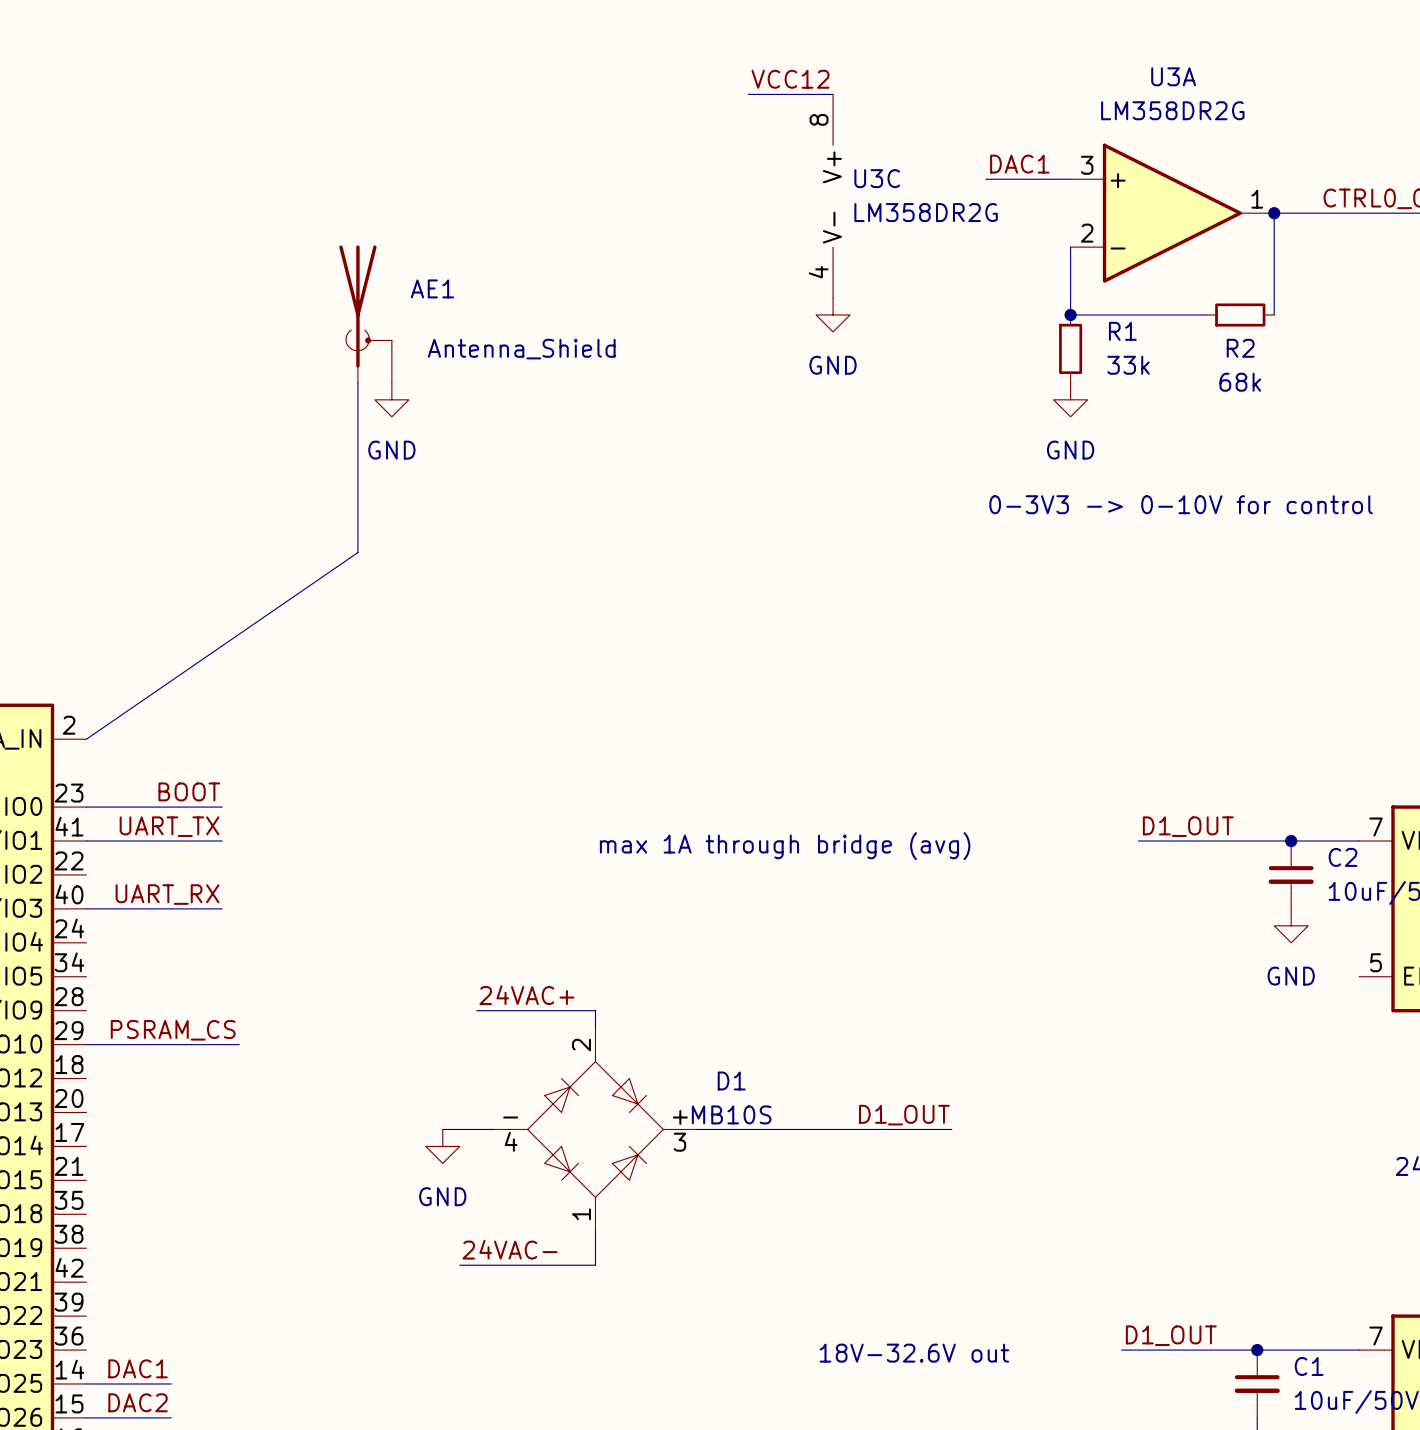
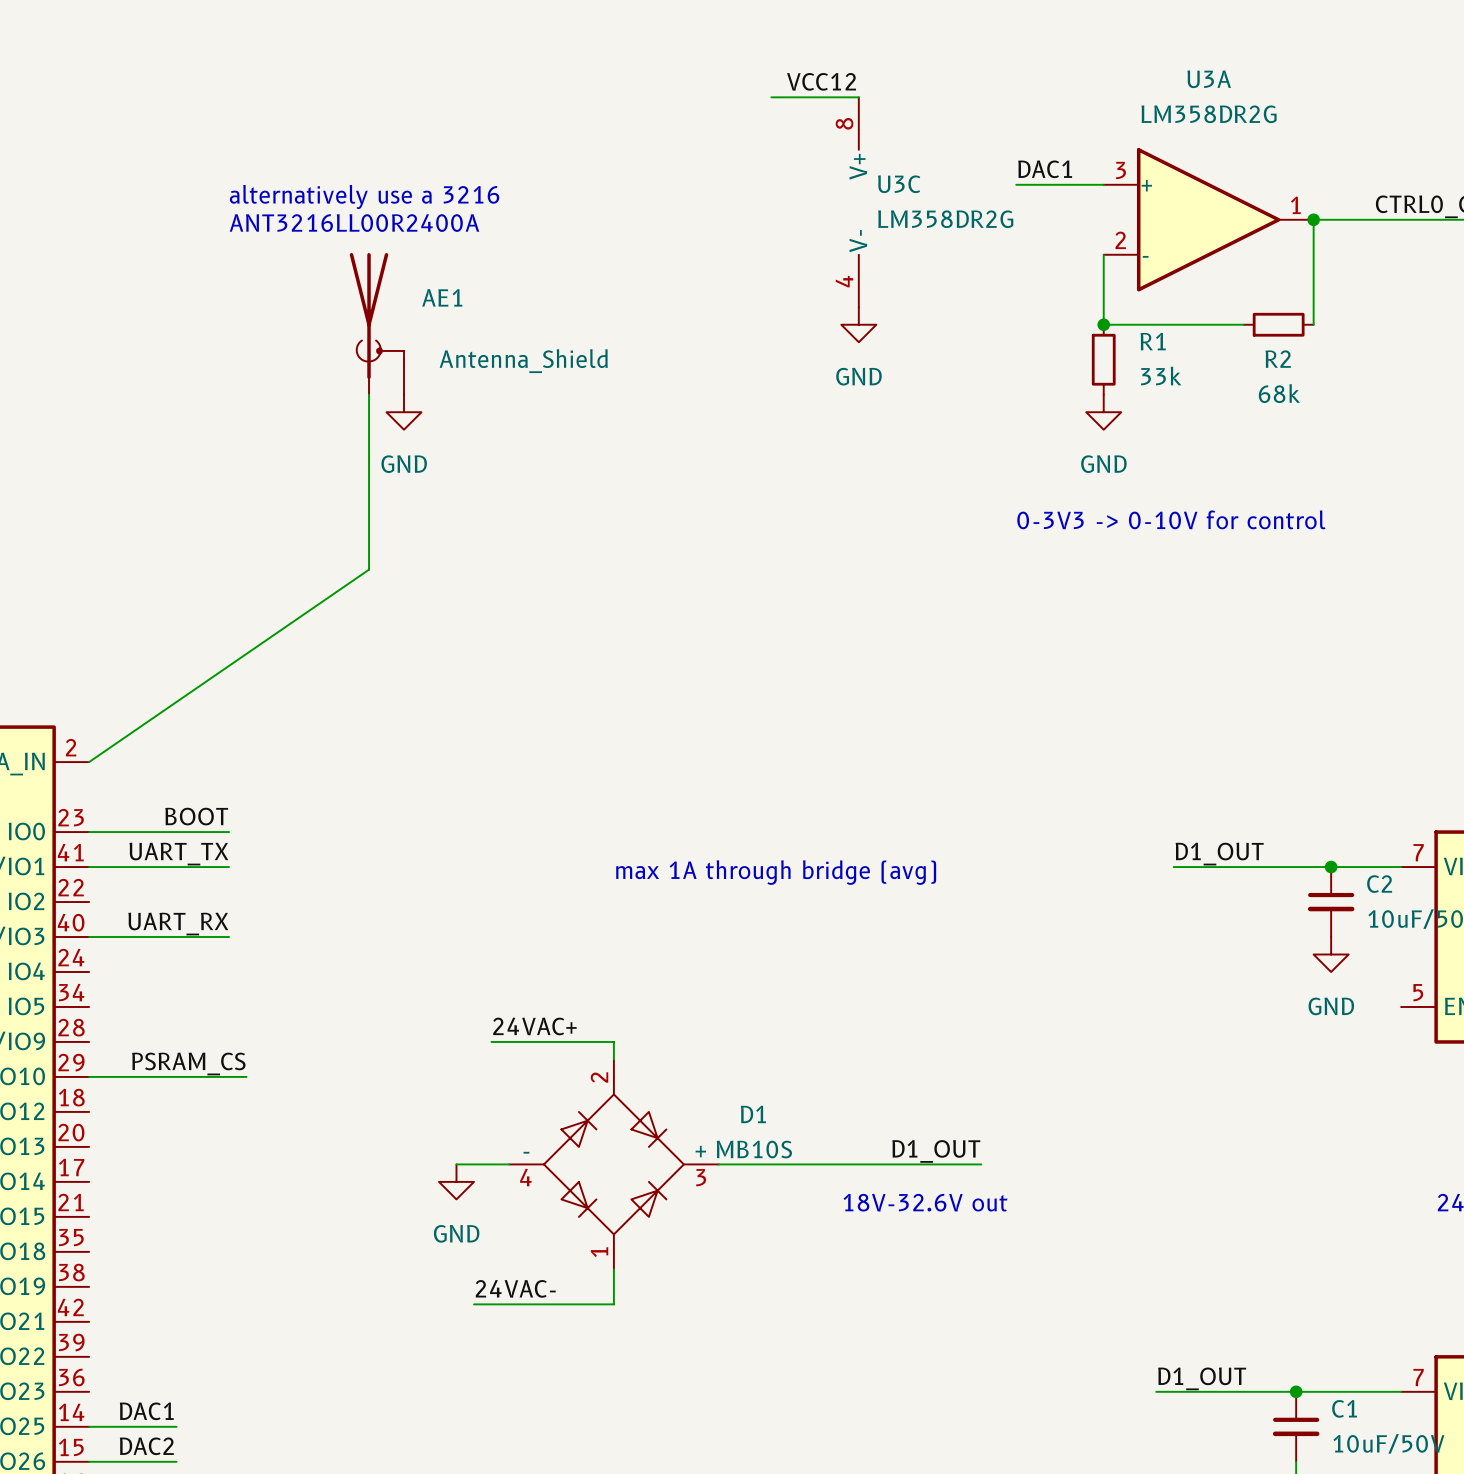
text: none -> alternatively use a 3216 (364, 196)
text: none -> ANT3216LL00R2400A (354, 223)
text position: 18V-32.6V out (914, 1353) -> 18V-32.6V out (925, 1202)

